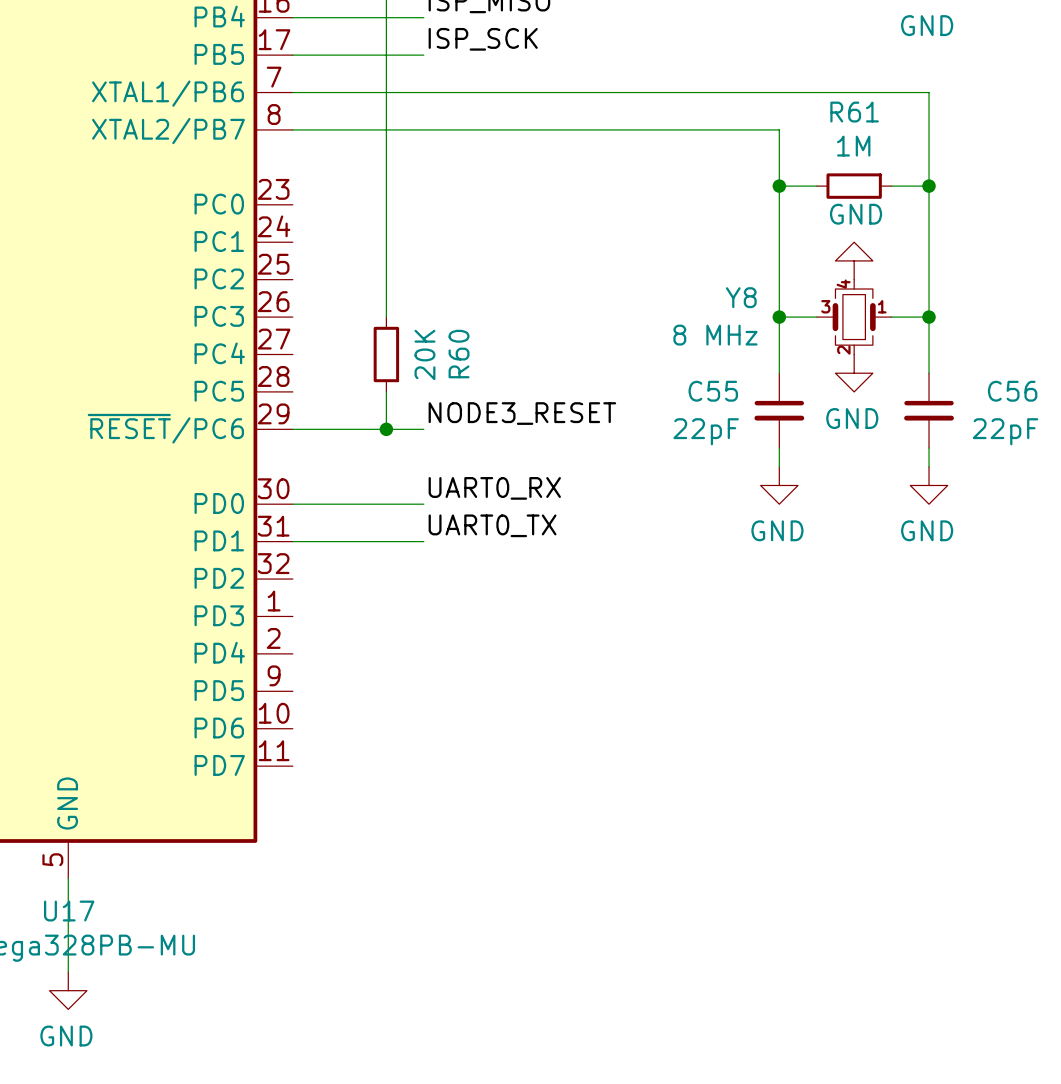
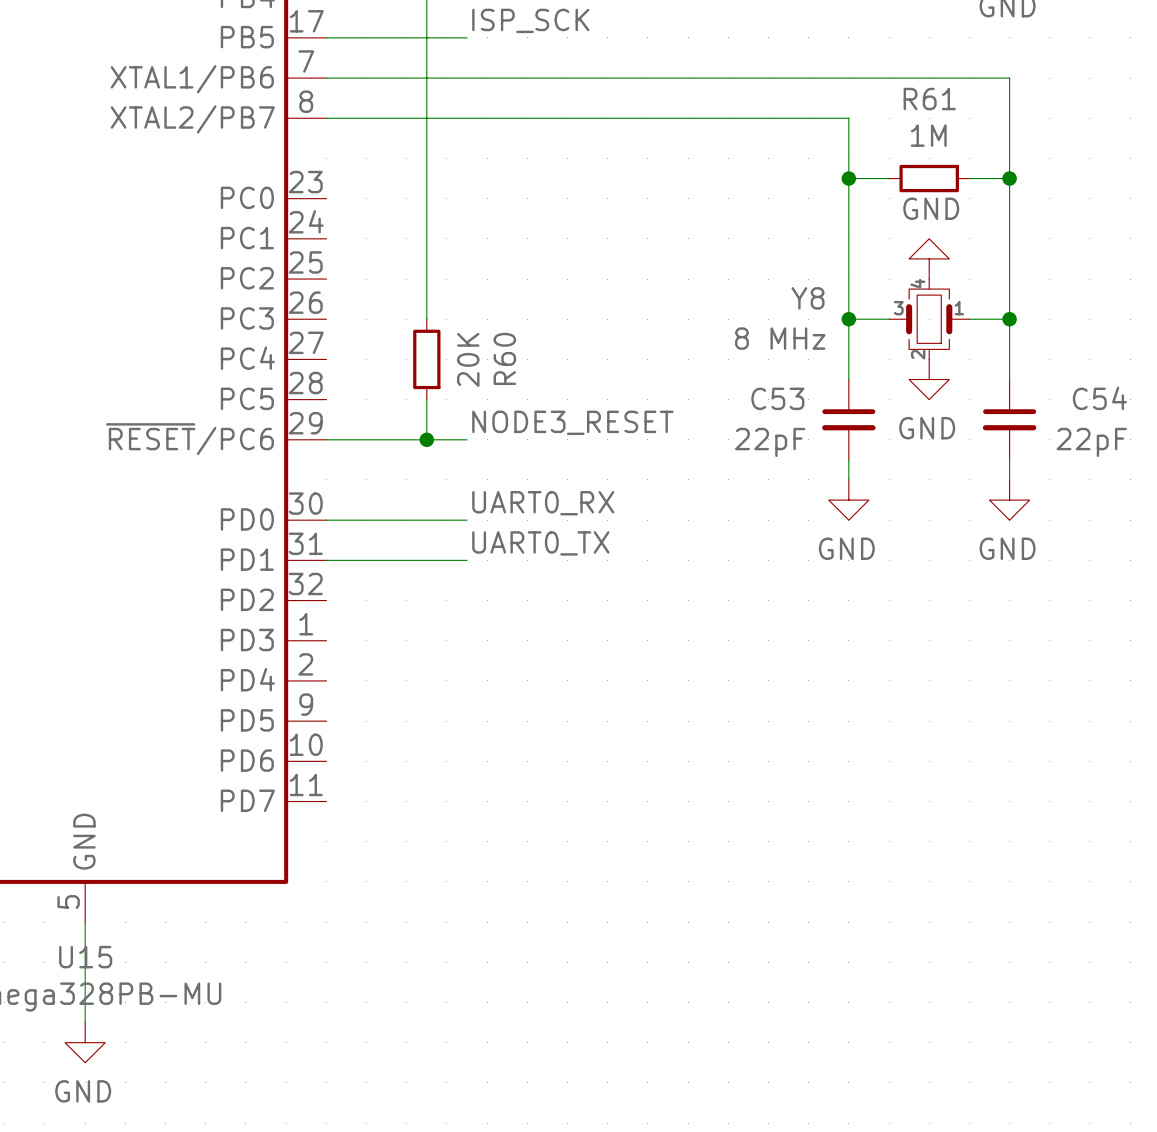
C55 name: C55 (713, 391) -> C53 (777, 398)
C56 name: C56 (1012, 391) -> C54 (1099, 398)
U17 name: U17 (69, 911) -> U15 (85, 957)

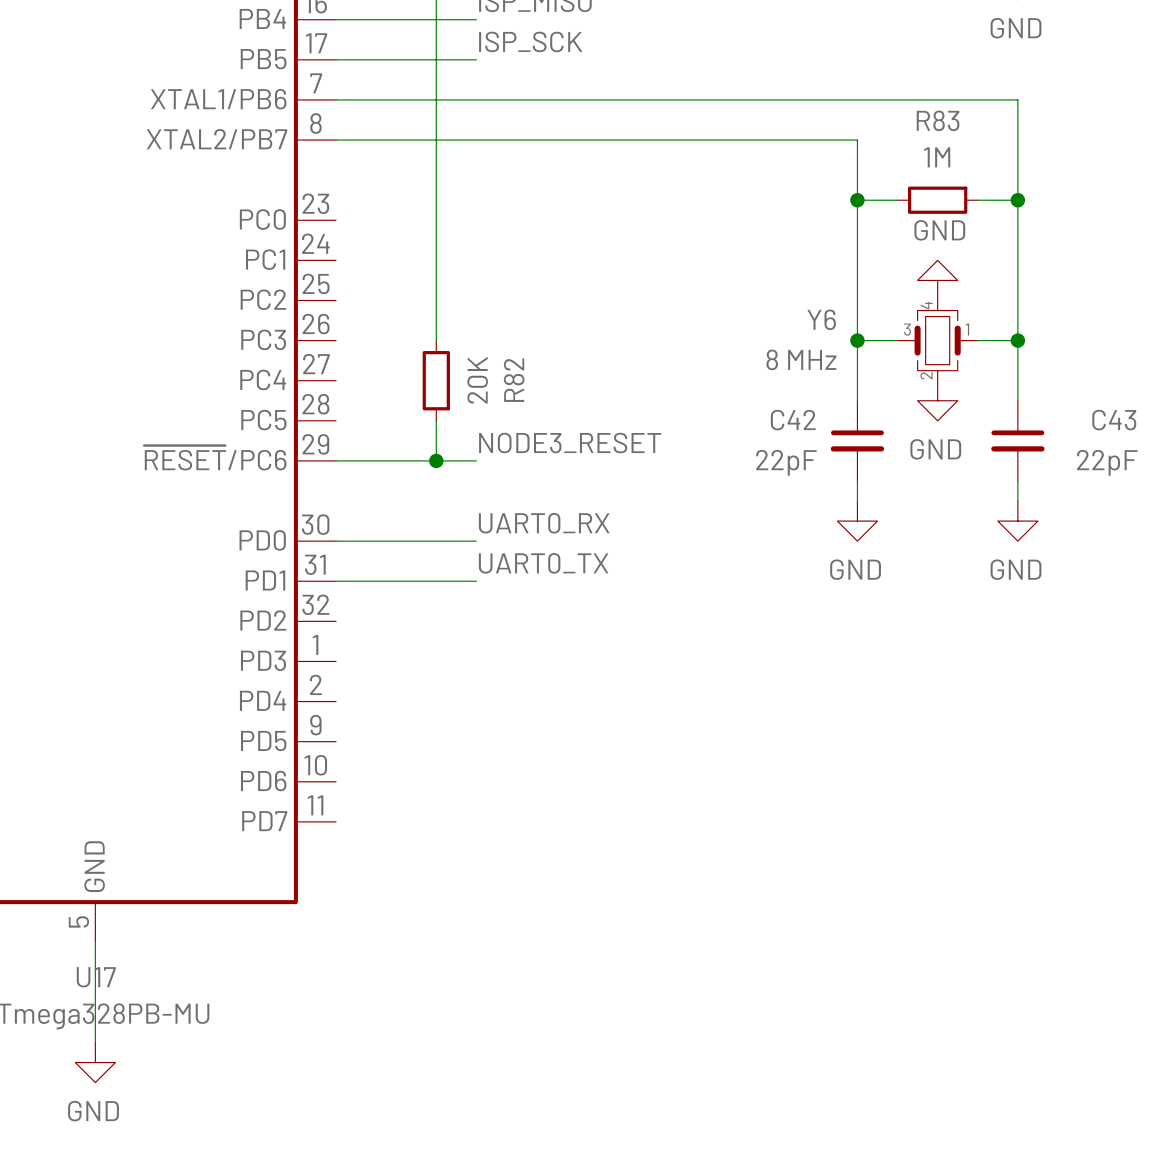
R61 name: R61 (929, 99) -> R83 (938, 120)
Y8 name: Y8 (808, 298) -> Y6 (821, 319)
R60 name: R60 (504, 358) -> R82 (514, 380)
C53 name: C53 (777, 398) -> C42 (793, 420)
C54 name: C54 (1099, 398) -> C43 (1114, 420)
U15 name: U15 (85, 957) -> U17 (96, 977)

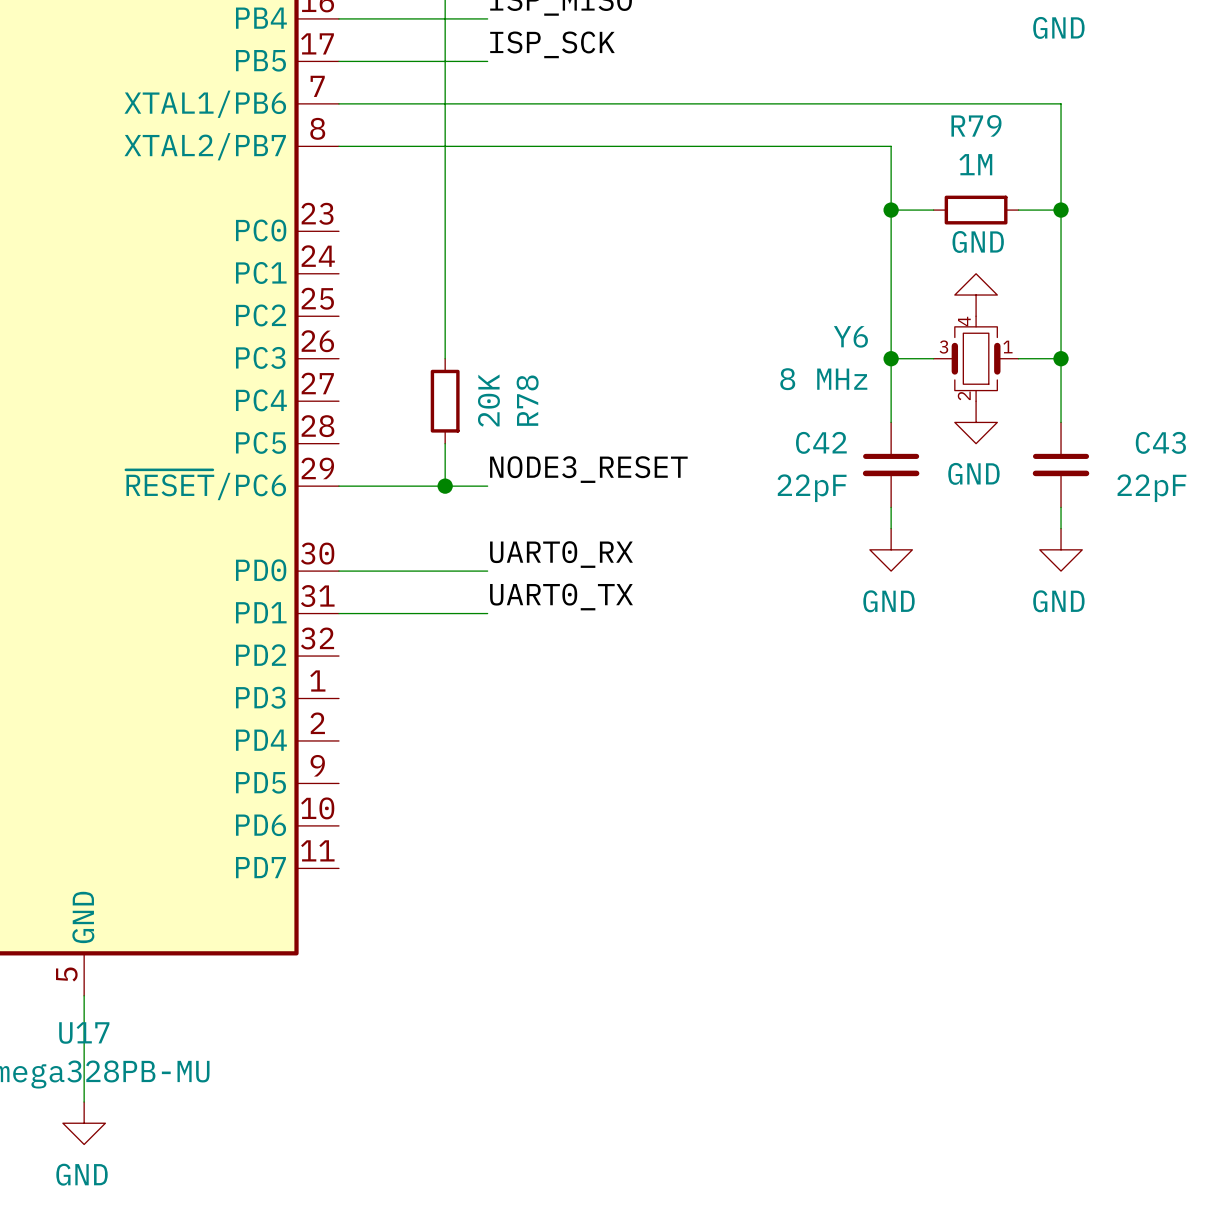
R83 name: R83 (938, 120) -> R79 (976, 125)
R82 name: R82 (514, 380) -> R78 (527, 400)

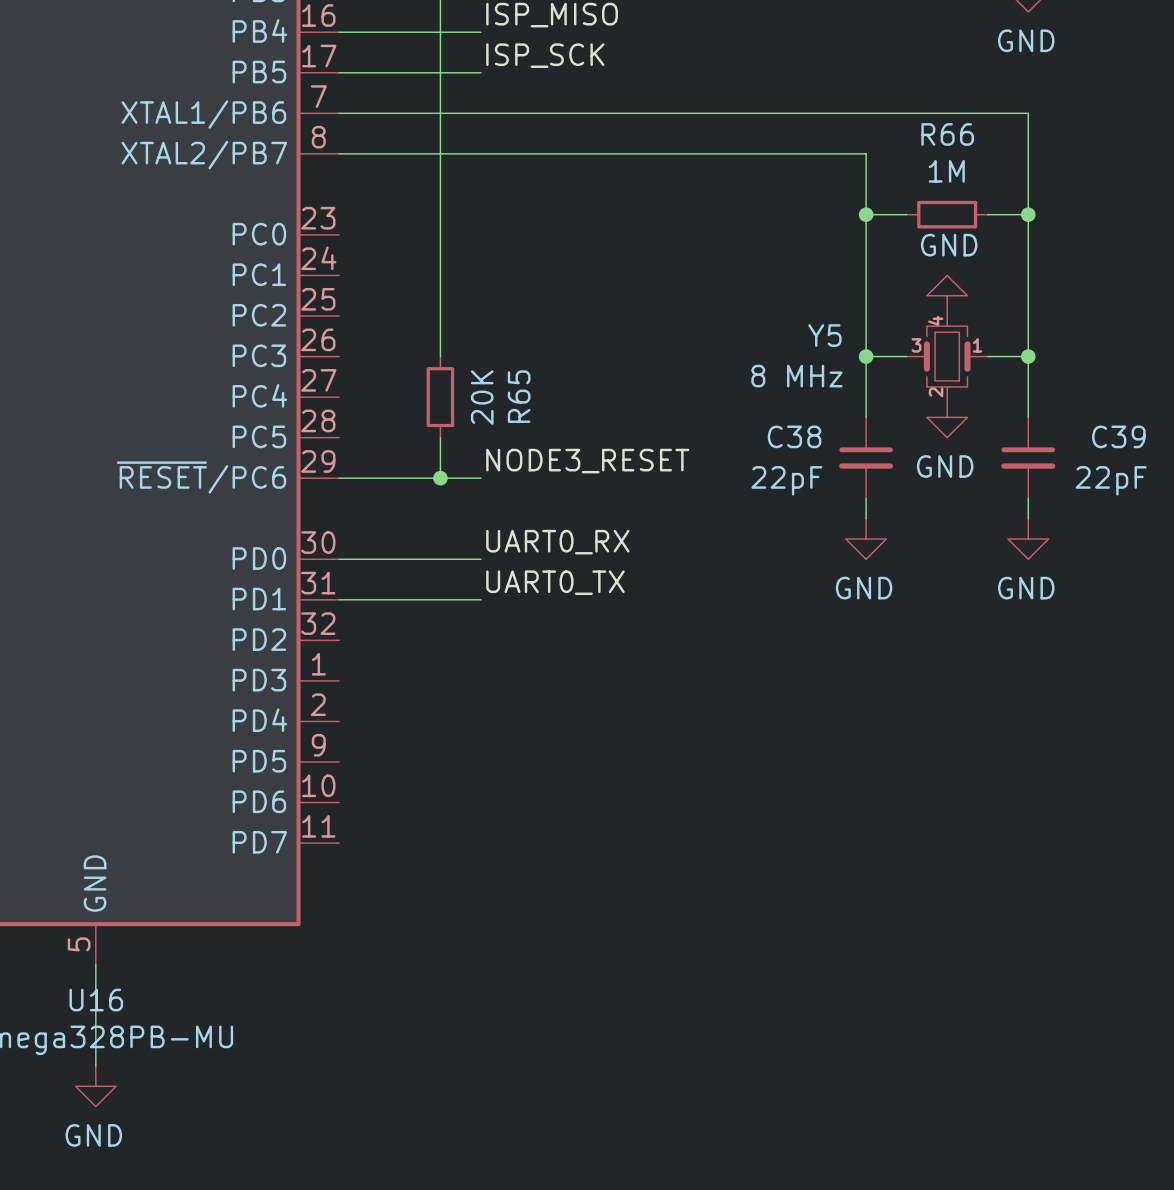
R79 name: R79 (976, 125) -> R66 (947, 134)
Y6 name: Y6 (850, 336) -> Y5 (824, 335)
R78 name: R78 (527, 400) -> R65 (519, 396)
C42 name: C42 (821, 442) -> C38 (794, 436)
C43 name: C43 (1160, 442) -> C39 (1118, 436)
U17 name: U17 (84, 1033) -> U16 (96, 1000)

